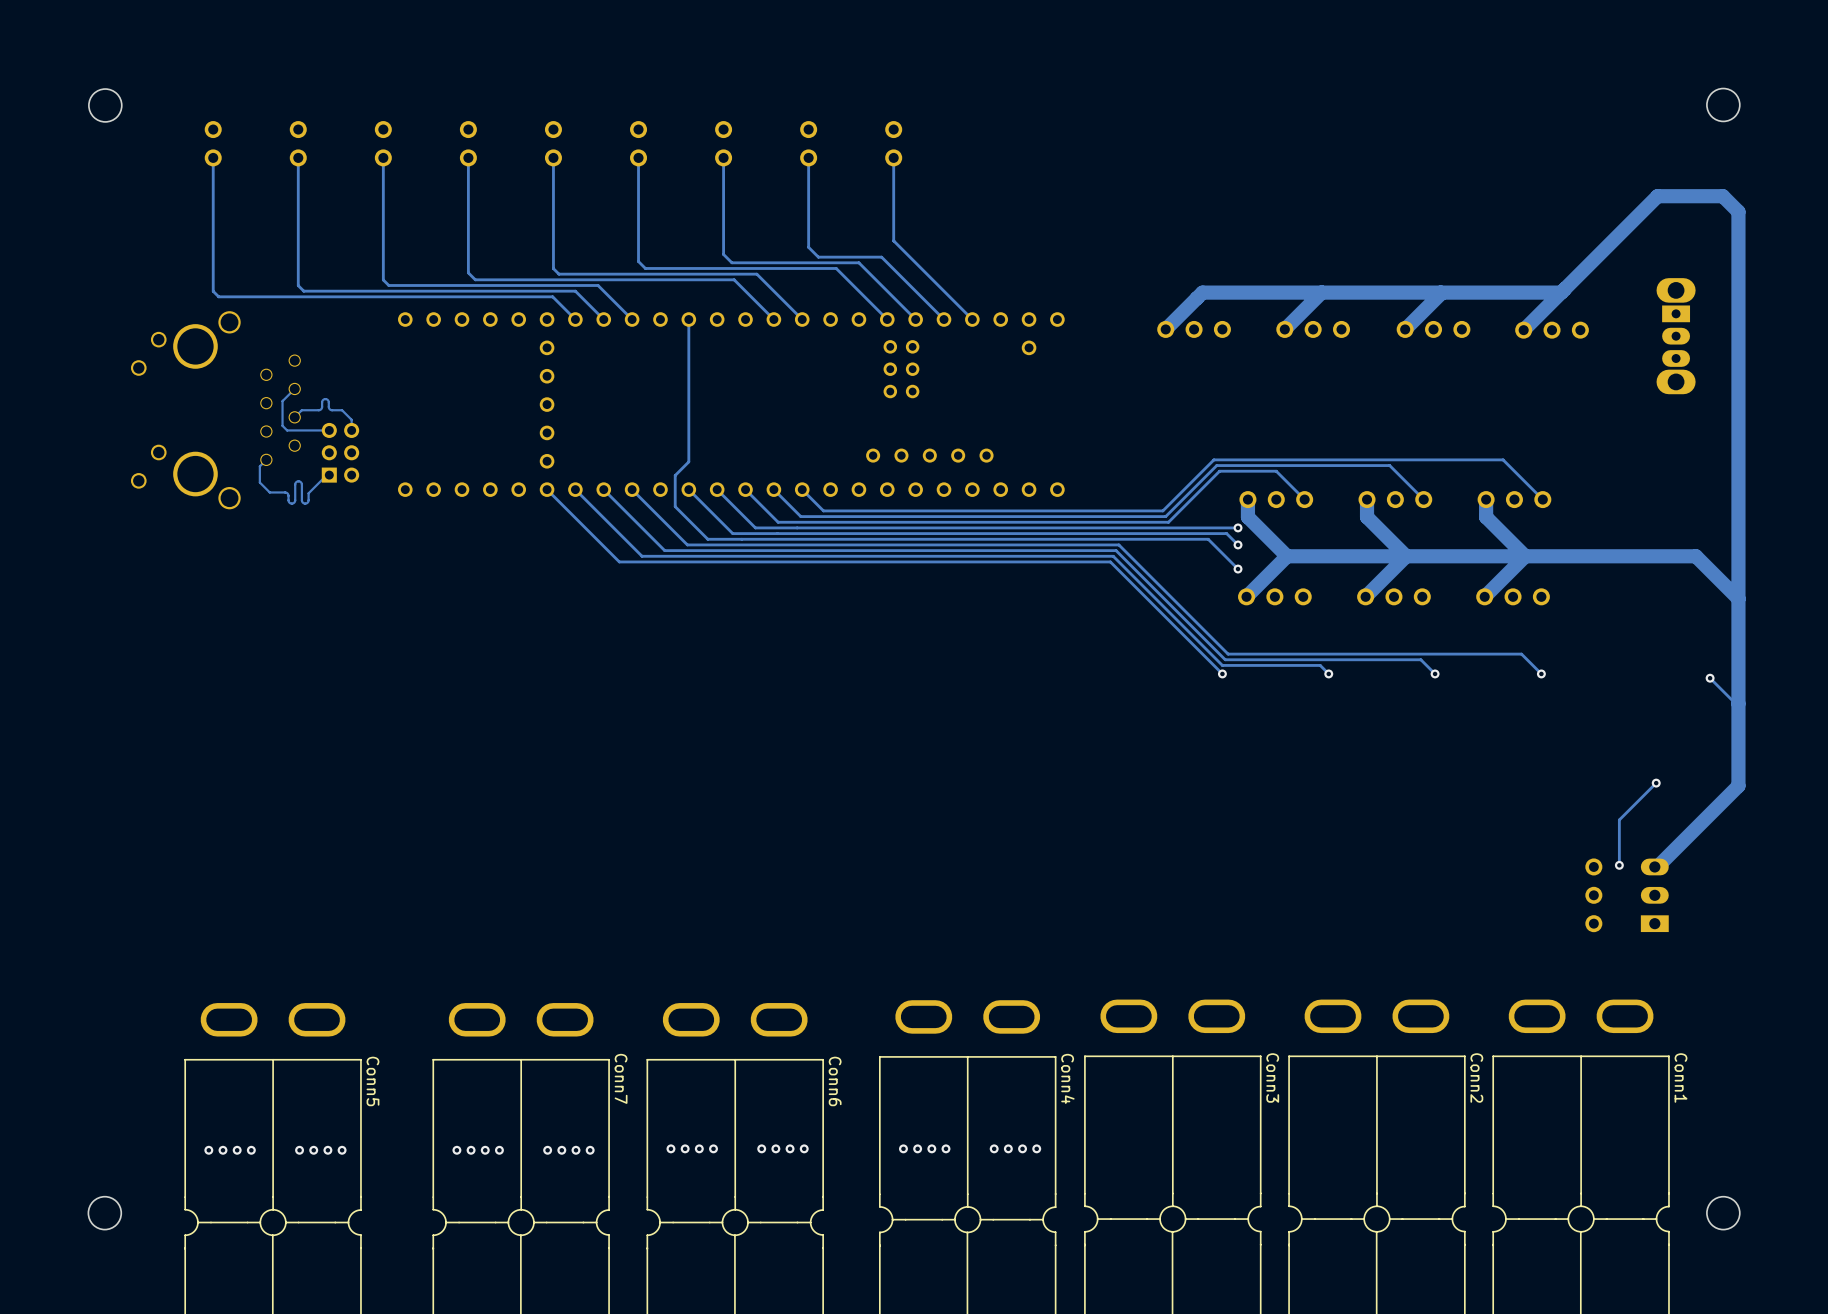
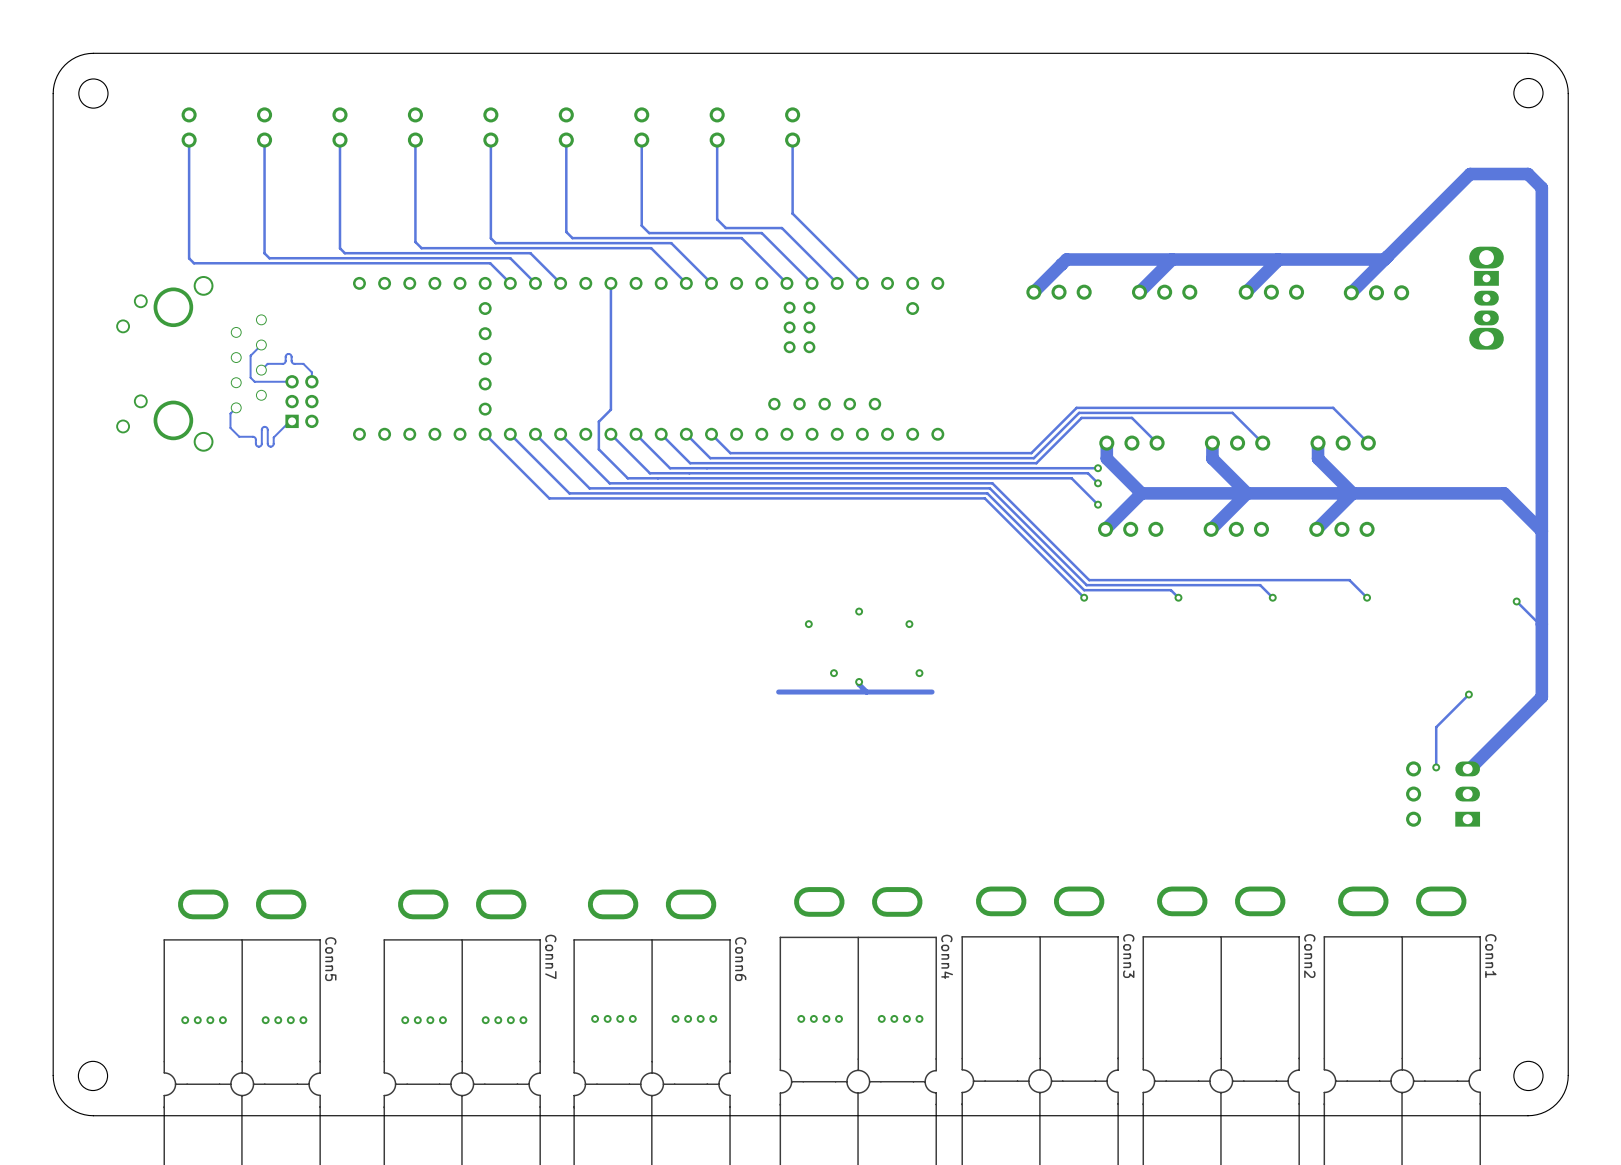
board edge: none -> (1528, 53) (93, 53) (80, 55) (68, 62) (57, 76) (53, 93) (53, 1075) (55, 1088) (61, 1100) (75, 1111) (93, 1115) (1528, 1115) (1541, 1113) (1553, 1106) (1564, 1092) (1568, 1075) (1568, 93) (1564, 76) (1556, 65) (1541, 55) (1528, 53)
via: none -> (859, 611)
via: none -> (808, 624)
via: none -> (909, 624)
via: none -> (833, 673)
via: none -> (919, 673)
track: none -> (859, 681) (859, 684) (866, 692)
via: none -> (859, 681)
track: none -> (932, 692) (778, 692)

